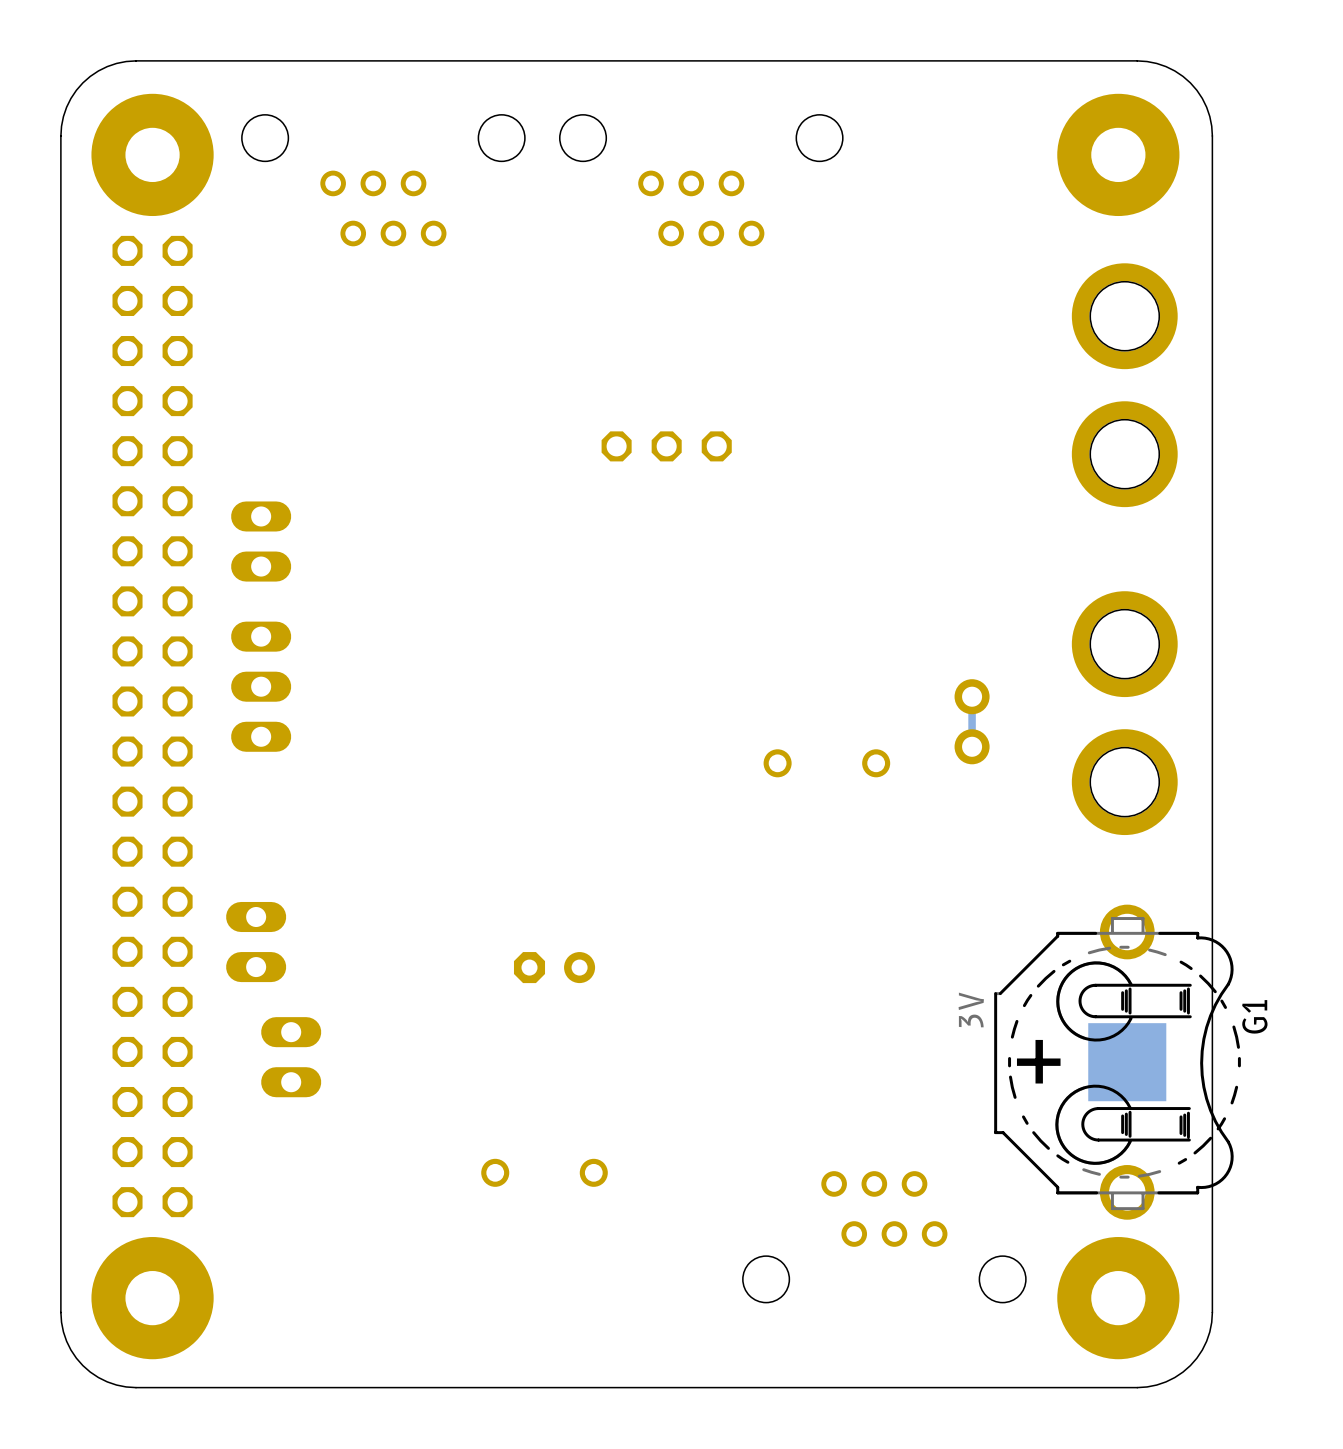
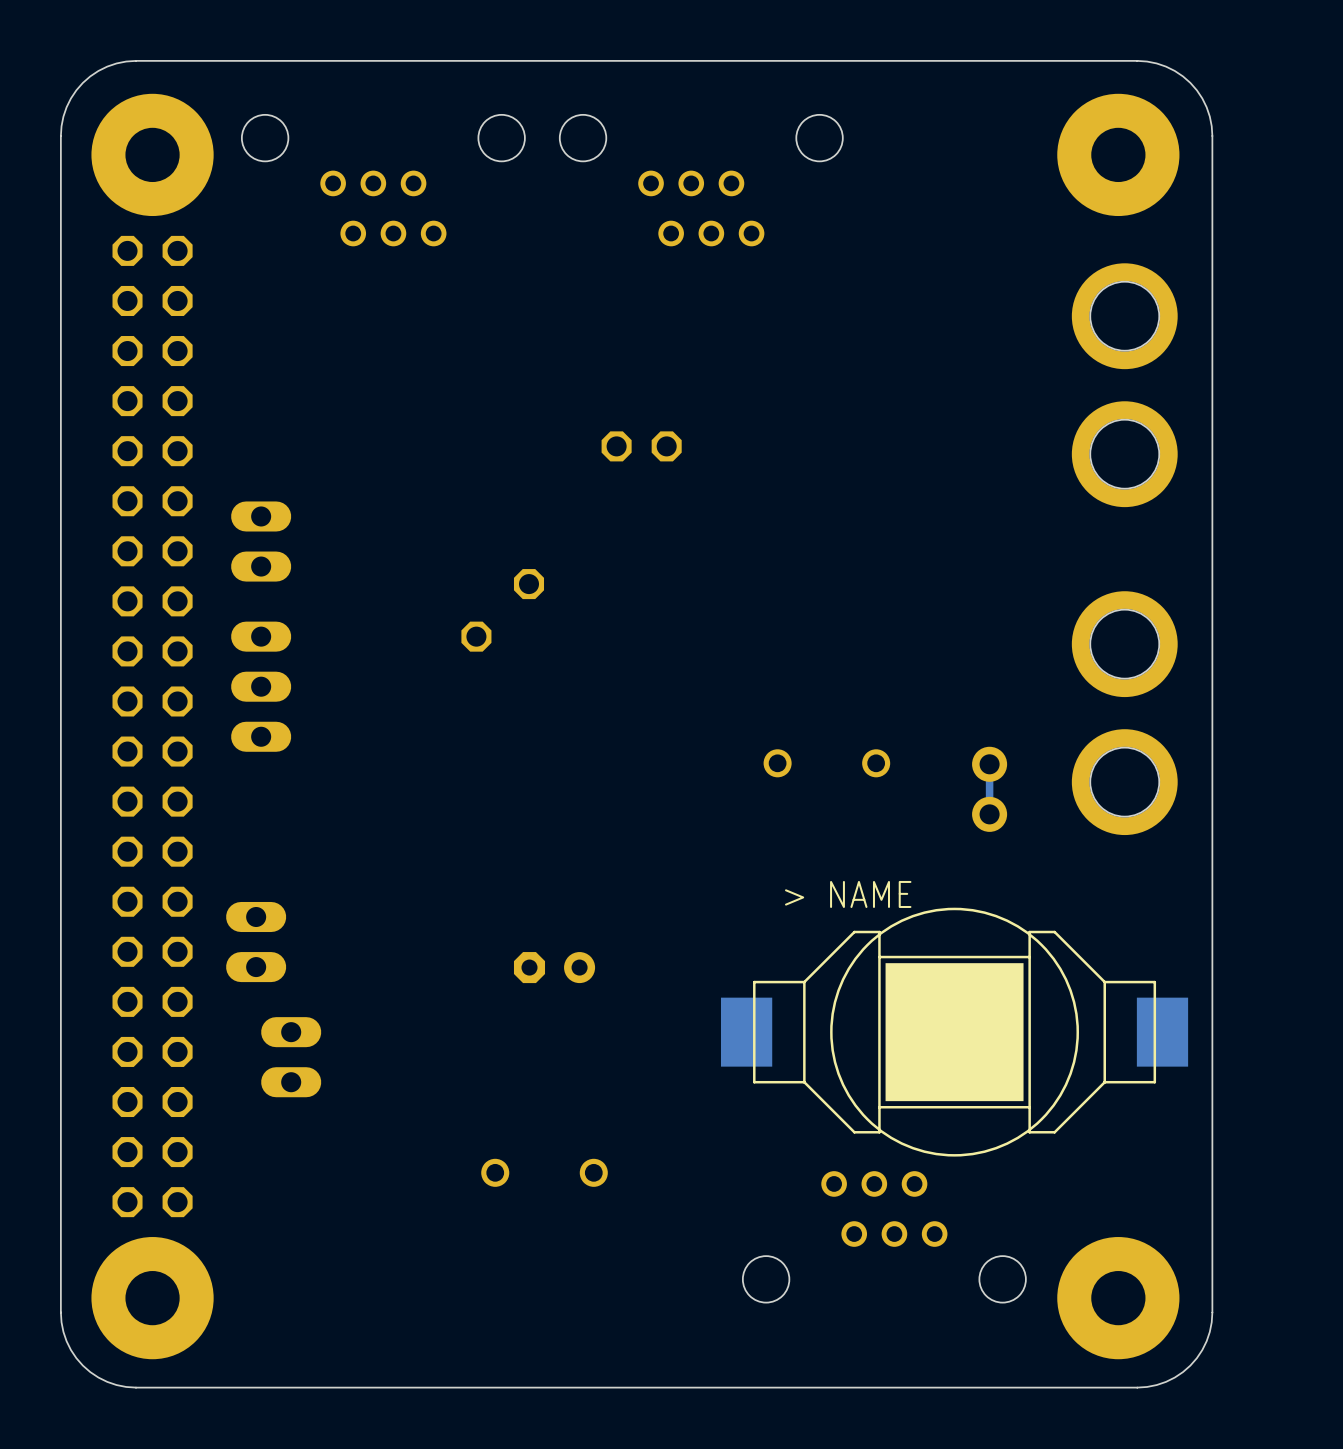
part: (716, 446) -> none
part: none -> (529, 584)
part: none -> (476, 636)
part position: (972, 721) -> (989, 789)
part: none -> (954, 1032)
G1: 3V (1117, 1062) -> none

